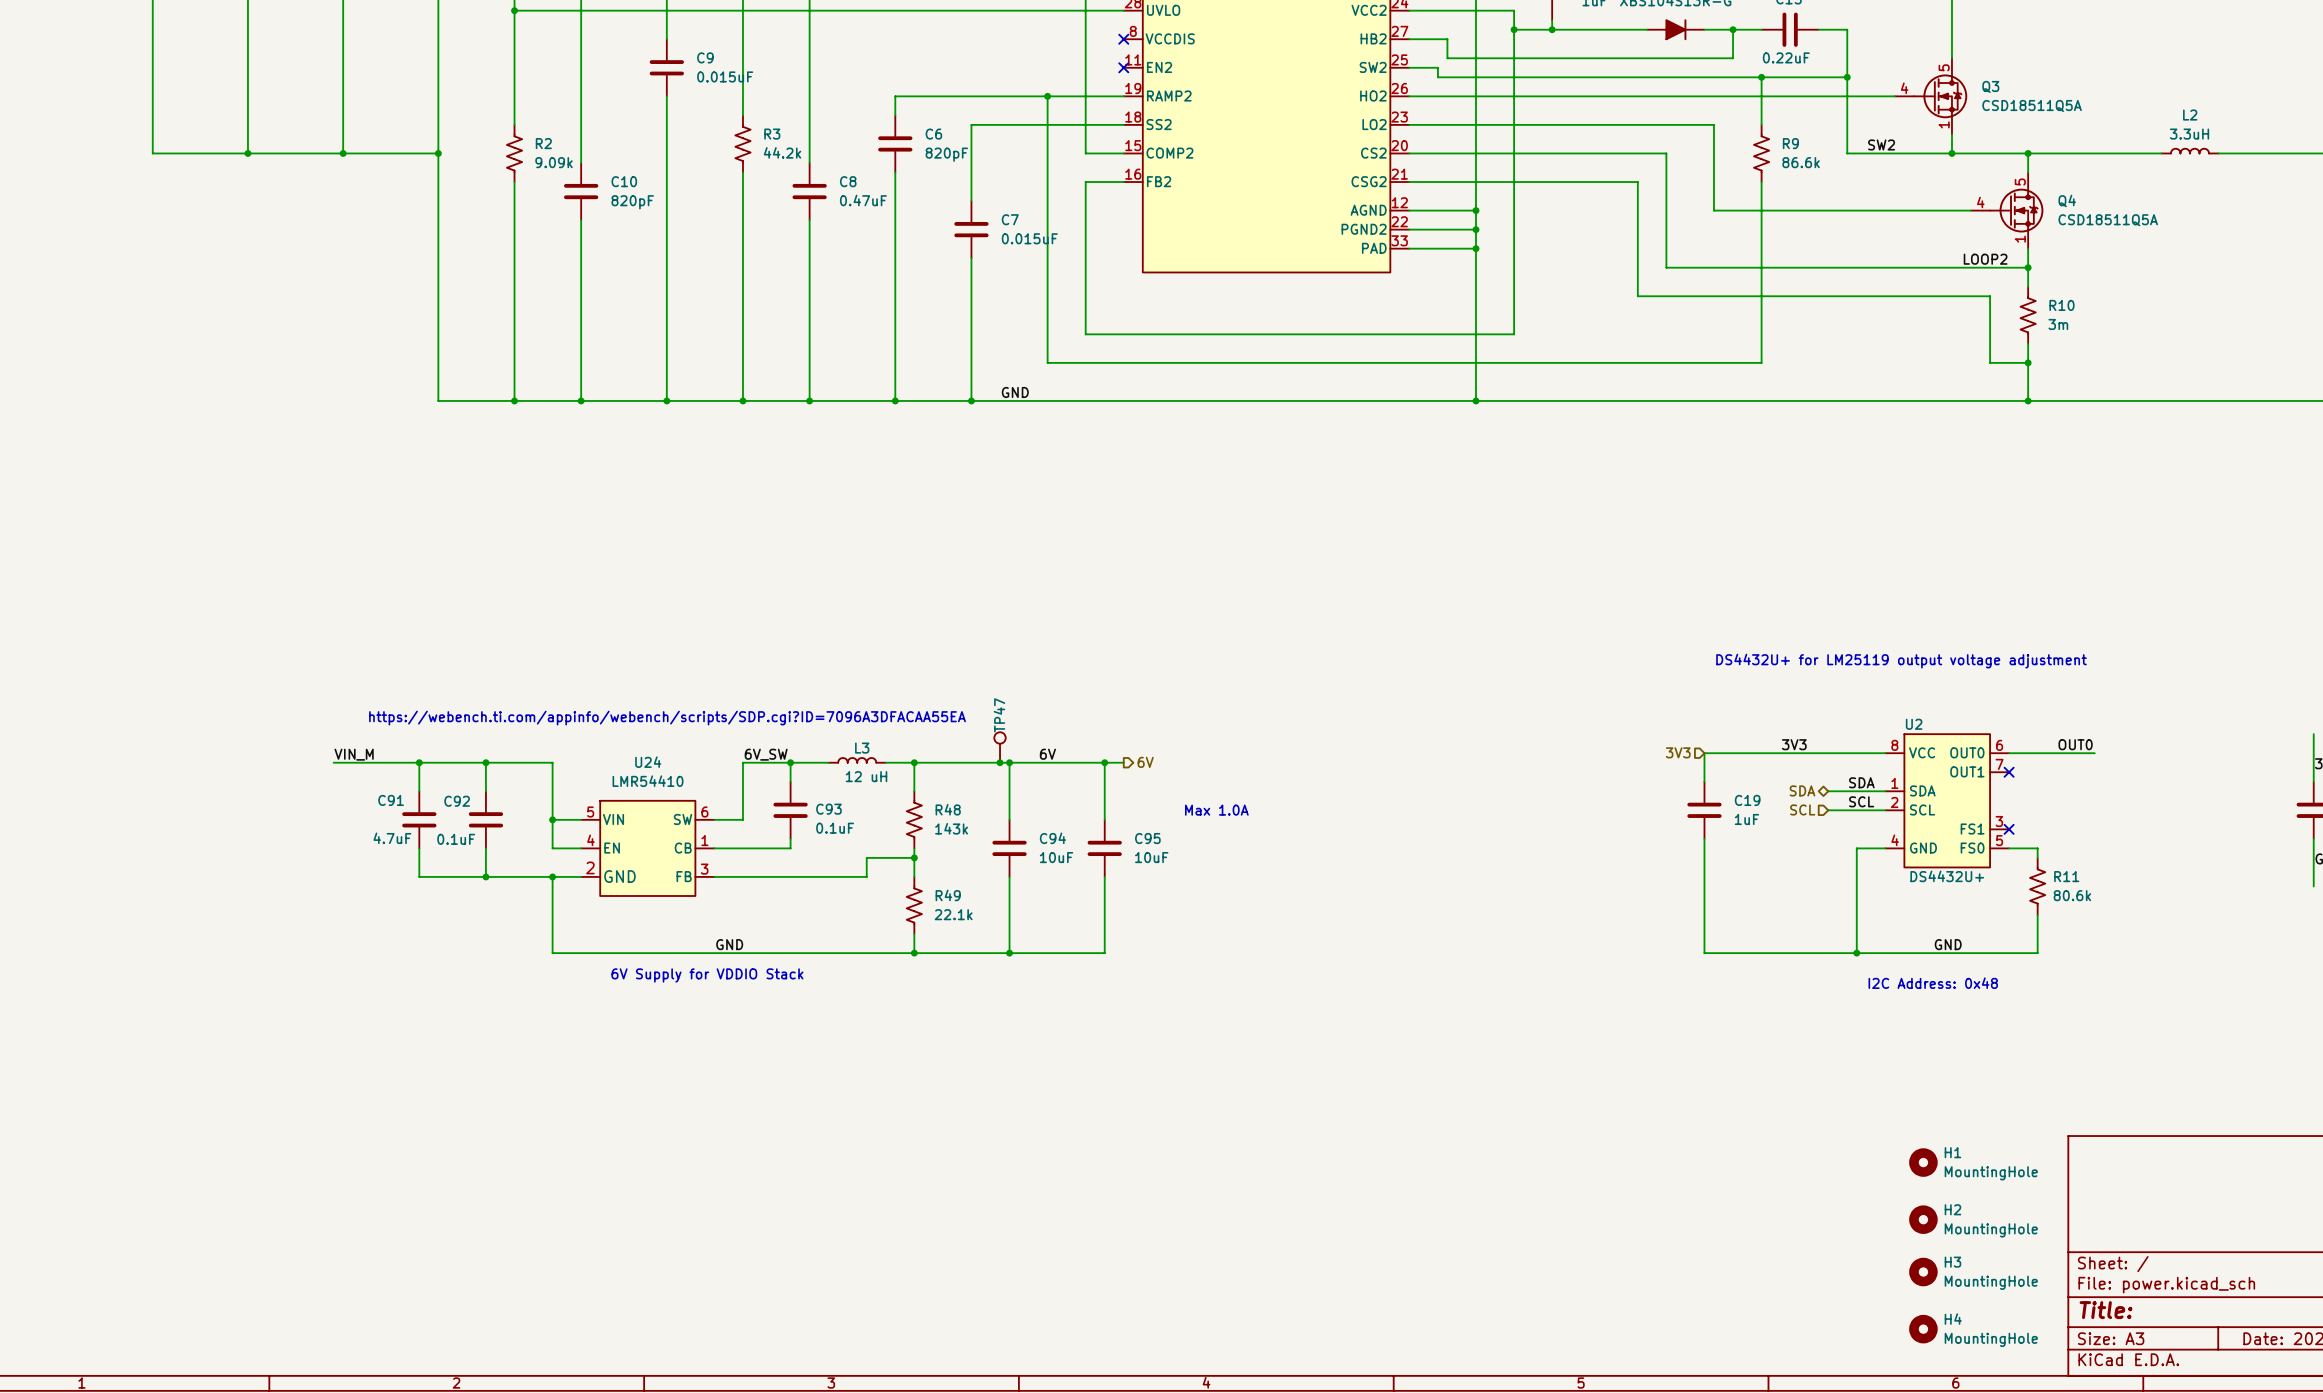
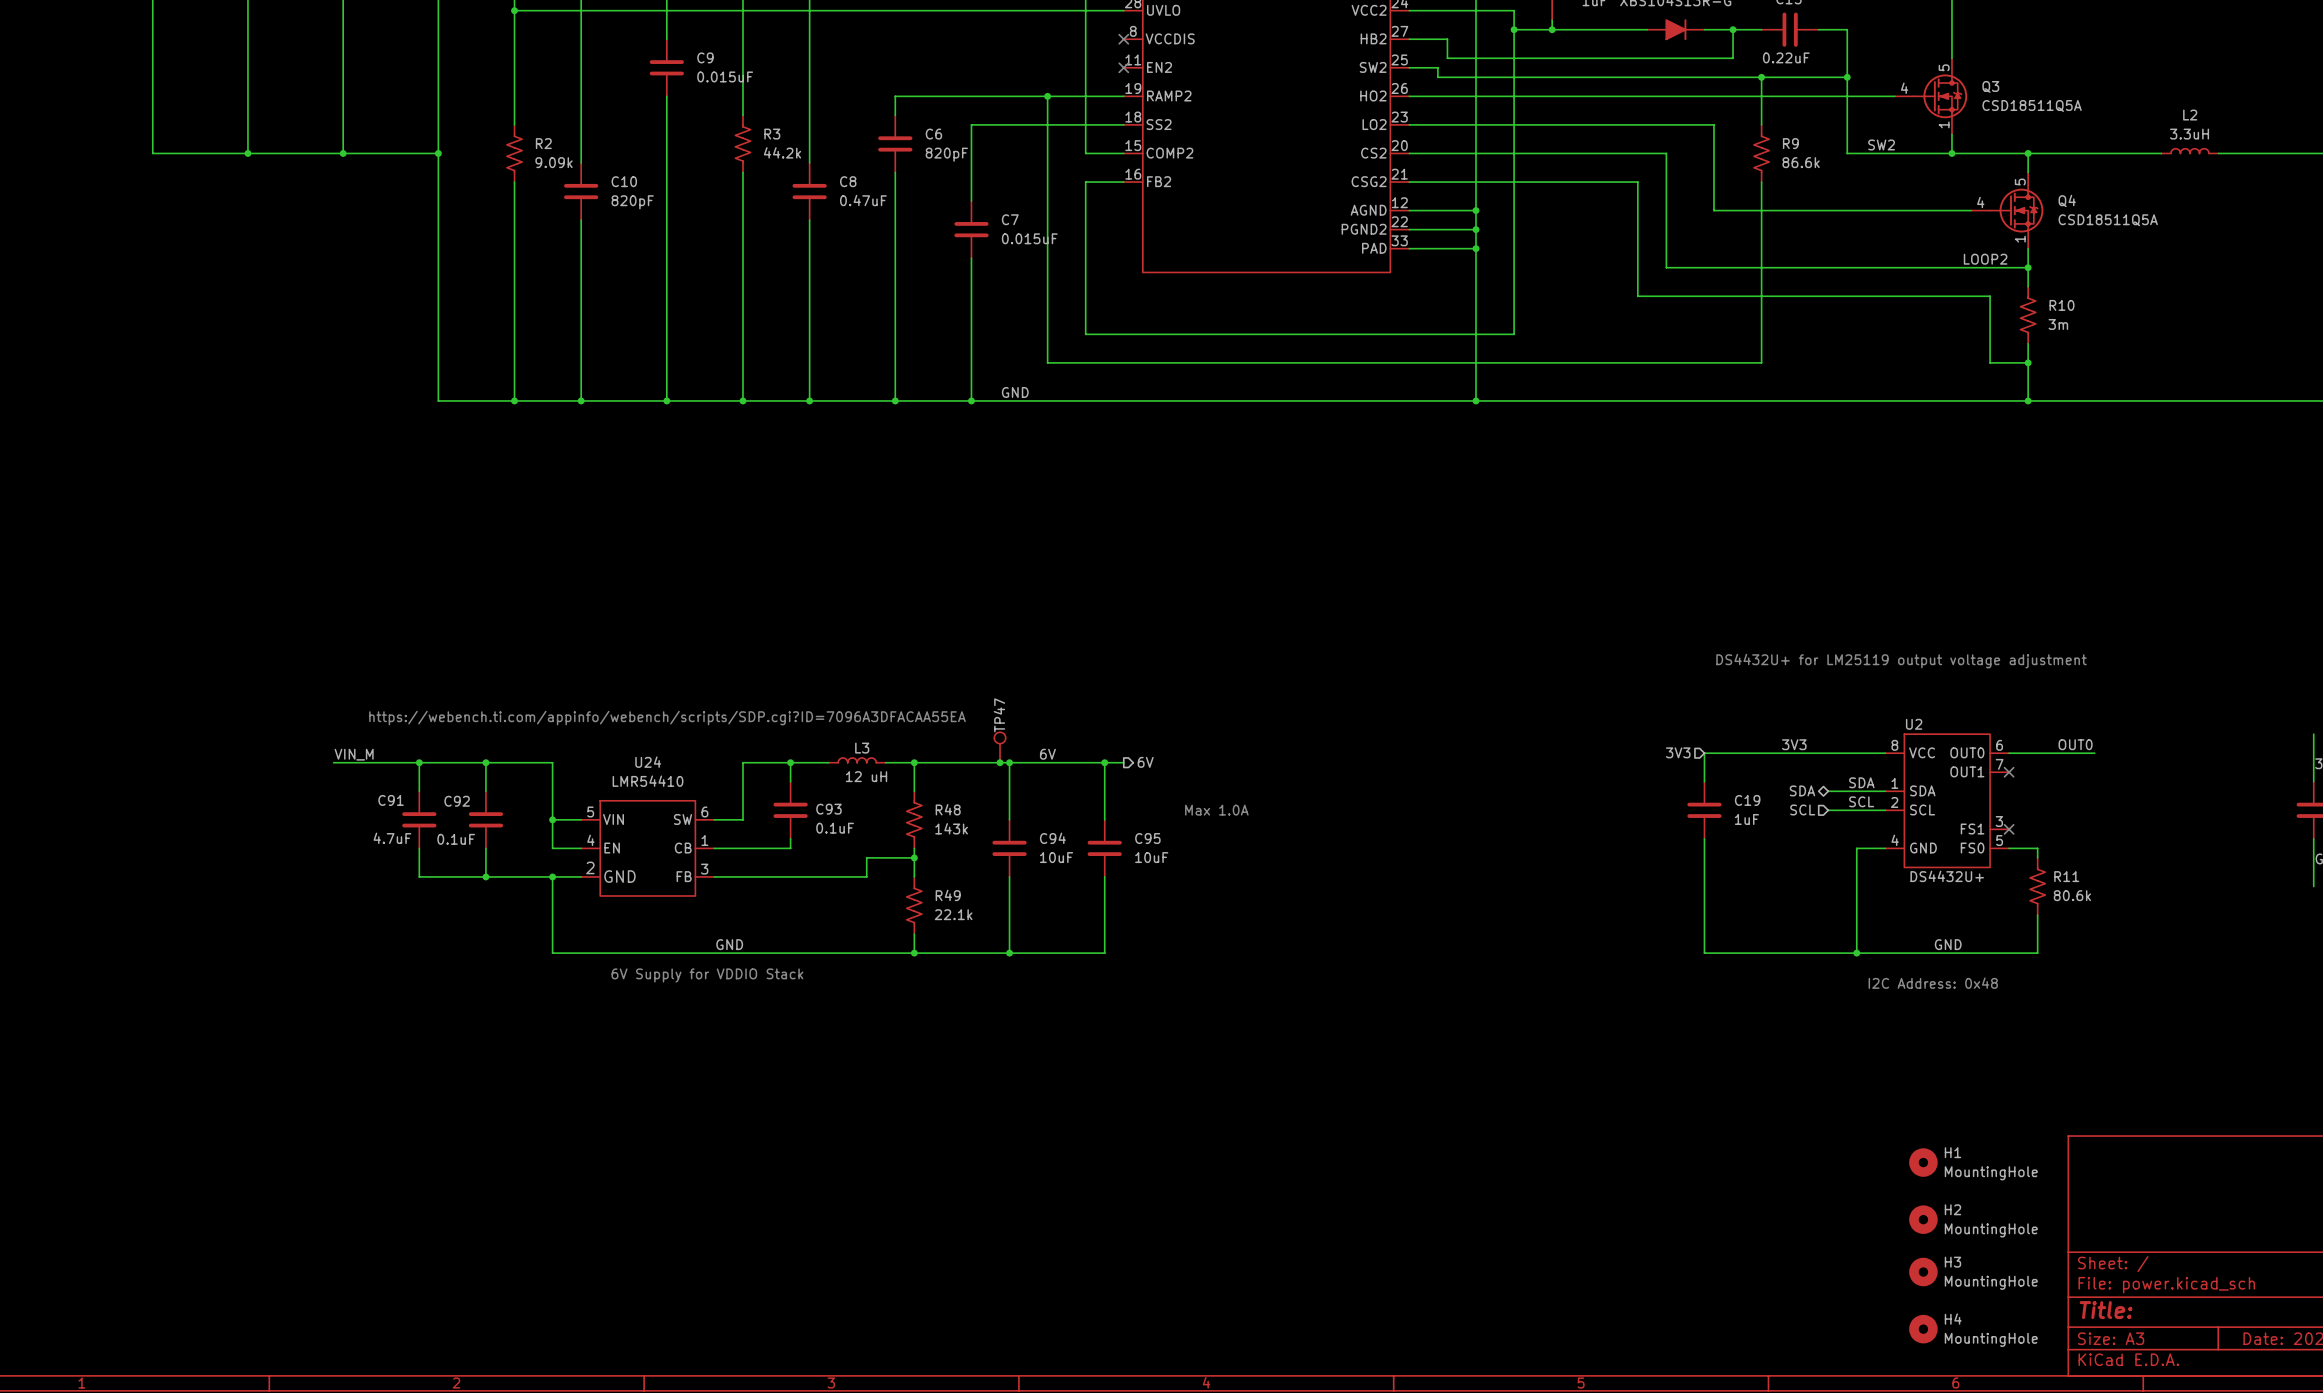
label: 6V_SW (766, 754) -> none

